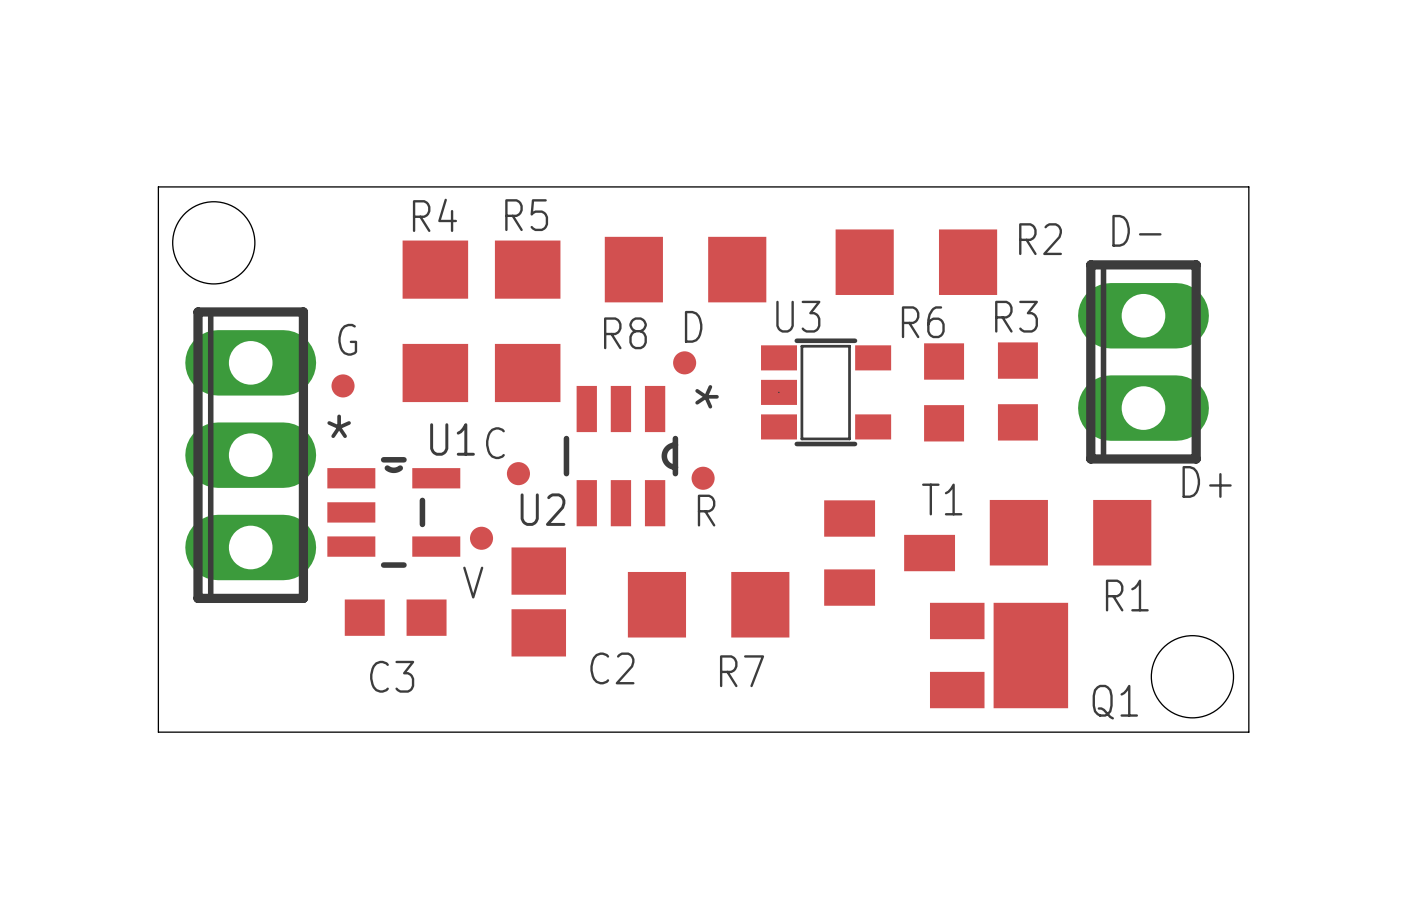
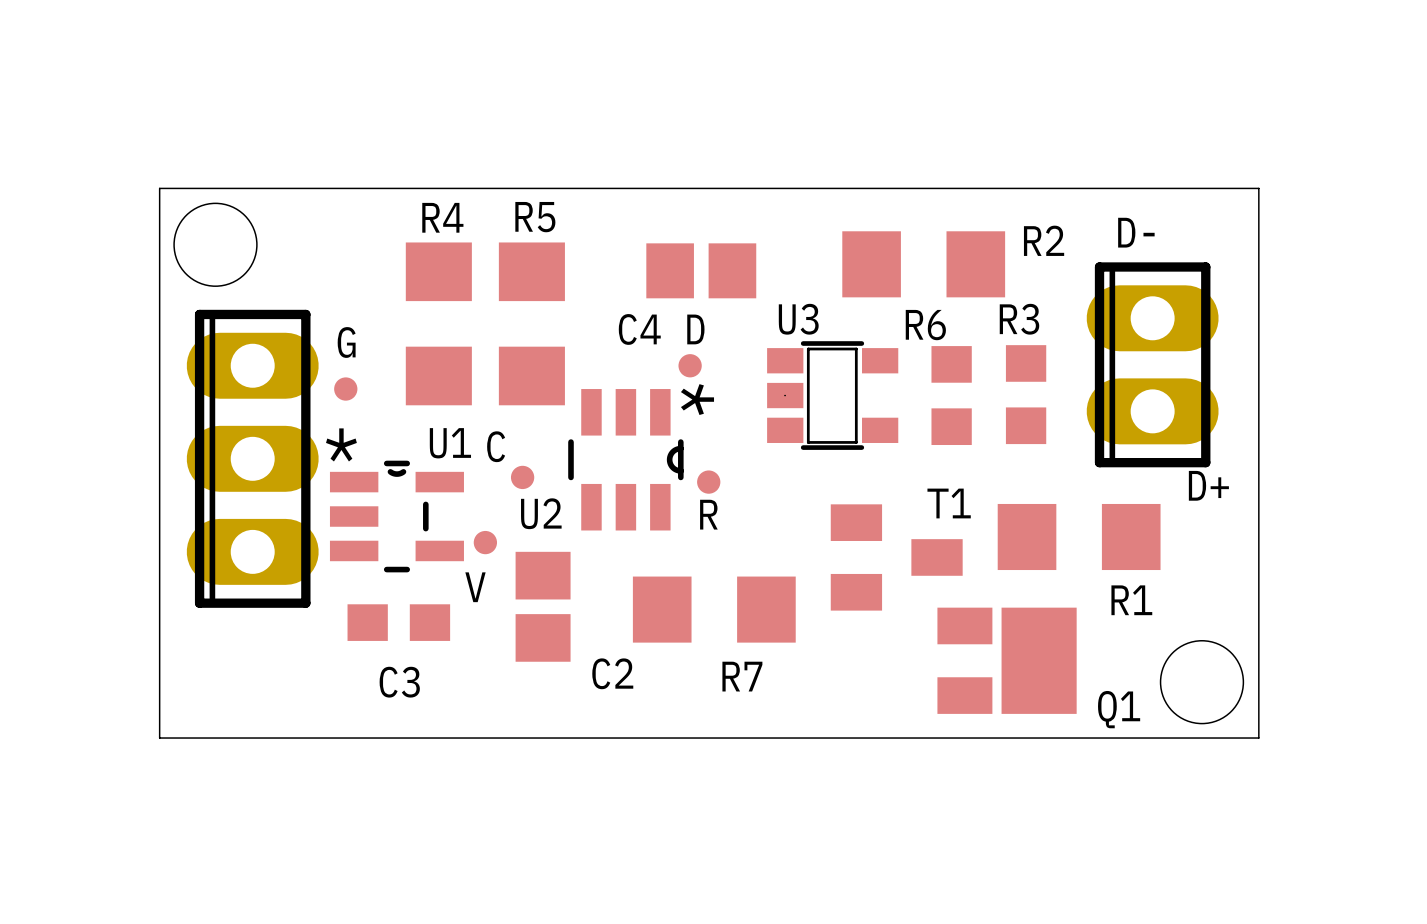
C4: none -> (701, 270)
R8: (685, 269) -> none

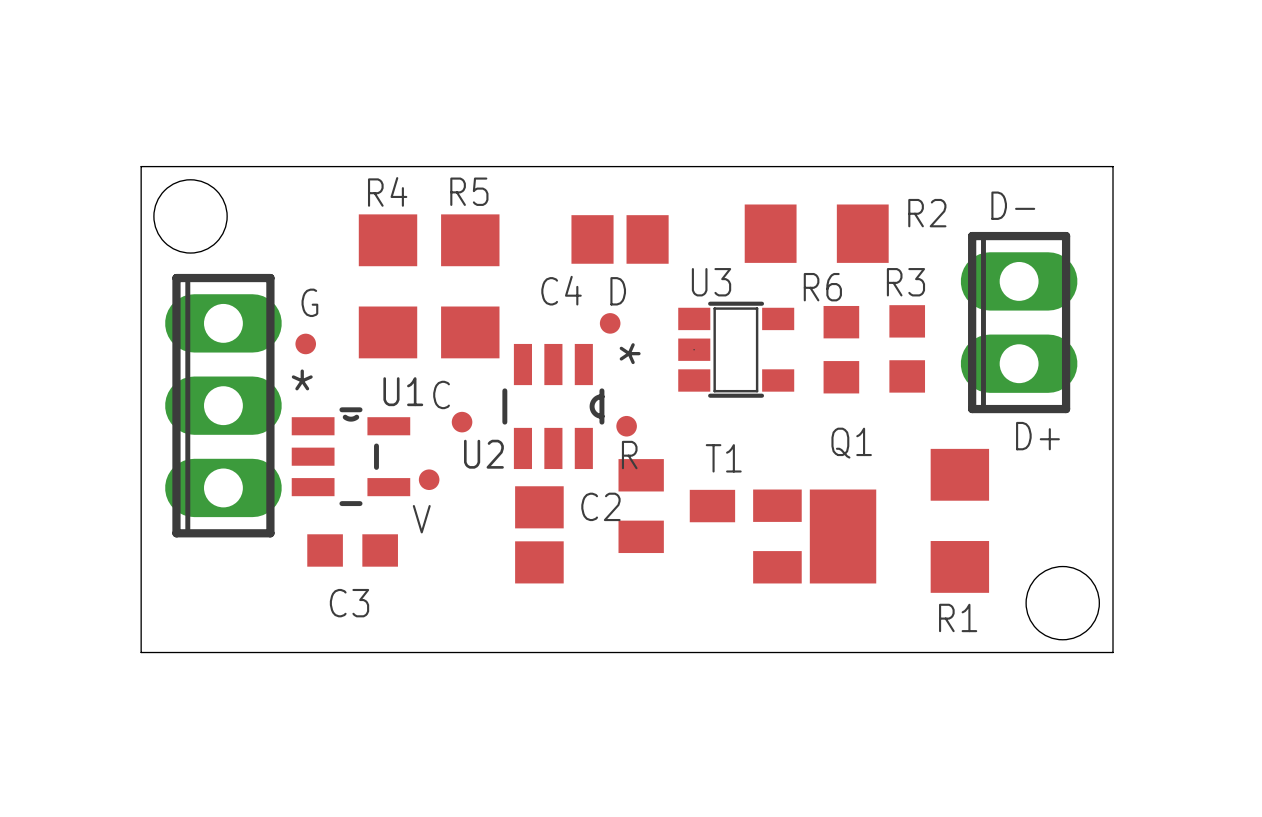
text position: D+ (1208, 485) -> D+ (1037, 436)
R1 rotation: 0° (1079, 536) -> 90° clockwise (959, 520)
T1 position: (896, 557) -> (676, 506)
R1 name position: R1 (1131, 600) -> R1 (958, 617)
C2 position: (543, 606) -> (539, 534)
R7: (714, 609) -> none
Q1 position: (1007, 660) -> (814, 536)
C2 name position: C2 (612, 673) -> C2 (600, 506)
Q1 name position: Q1 (1119, 709) -> Q1 (851, 443)

